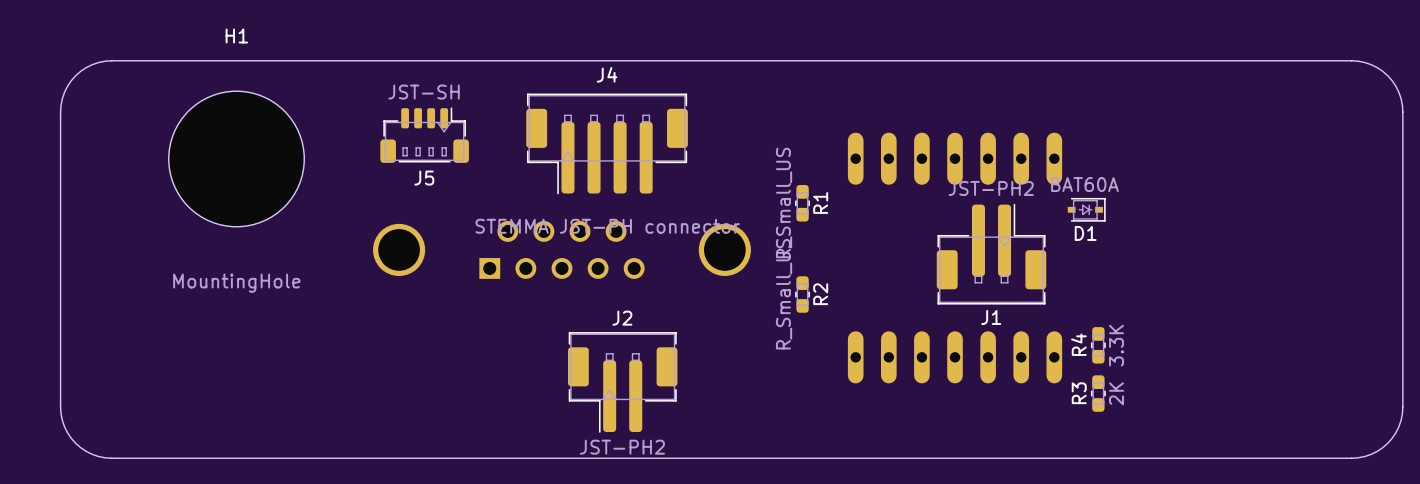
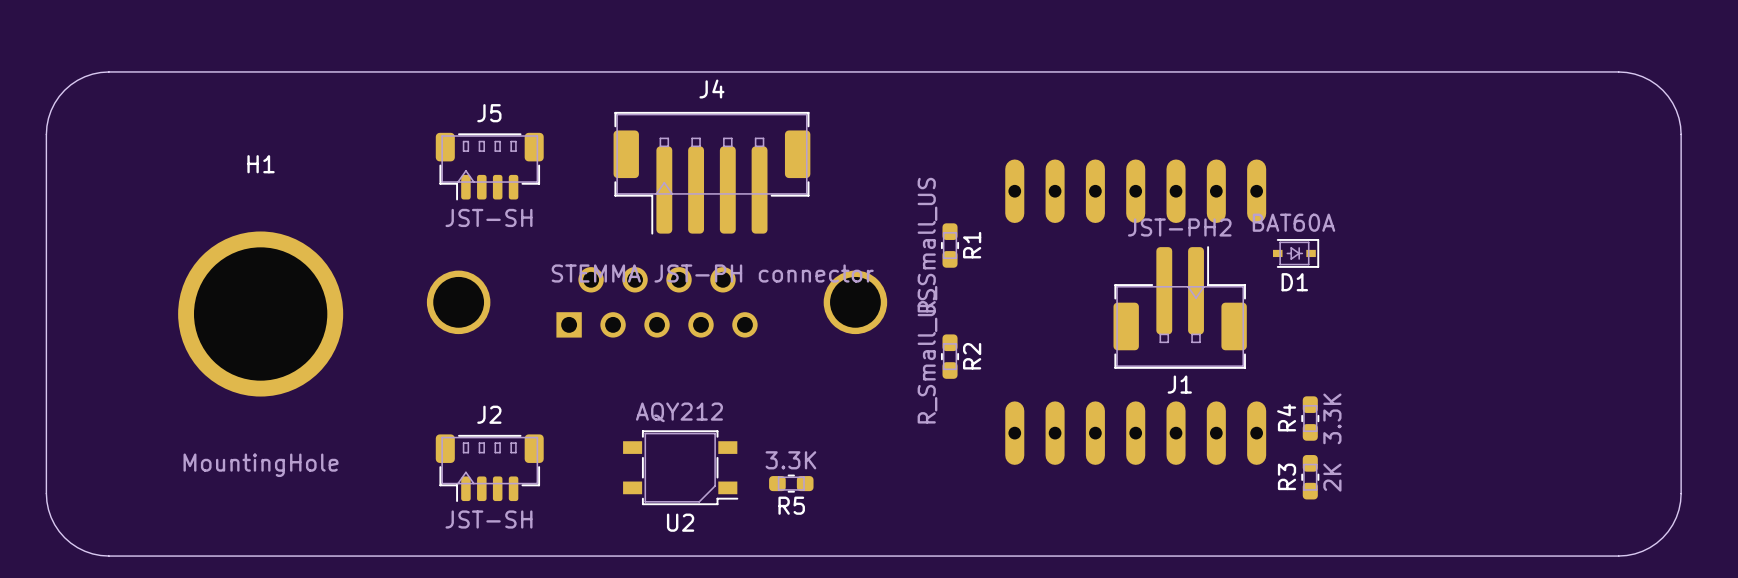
H1 footprint: [168, 91, 305, 227] -> [178, 231, 344, 397]
J5 rotation: 0° (424, 135) -> 180° (489, 166)
J2 footprint: [567, 332, 678, 433] -> [435, 434, 544, 503]
U2: none -> AQY212 (680, 467)
R5: none -> 3.3K (791, 483)
J2 value: JST-PH2 (622, 447) -> JST-SH (488, 519)

